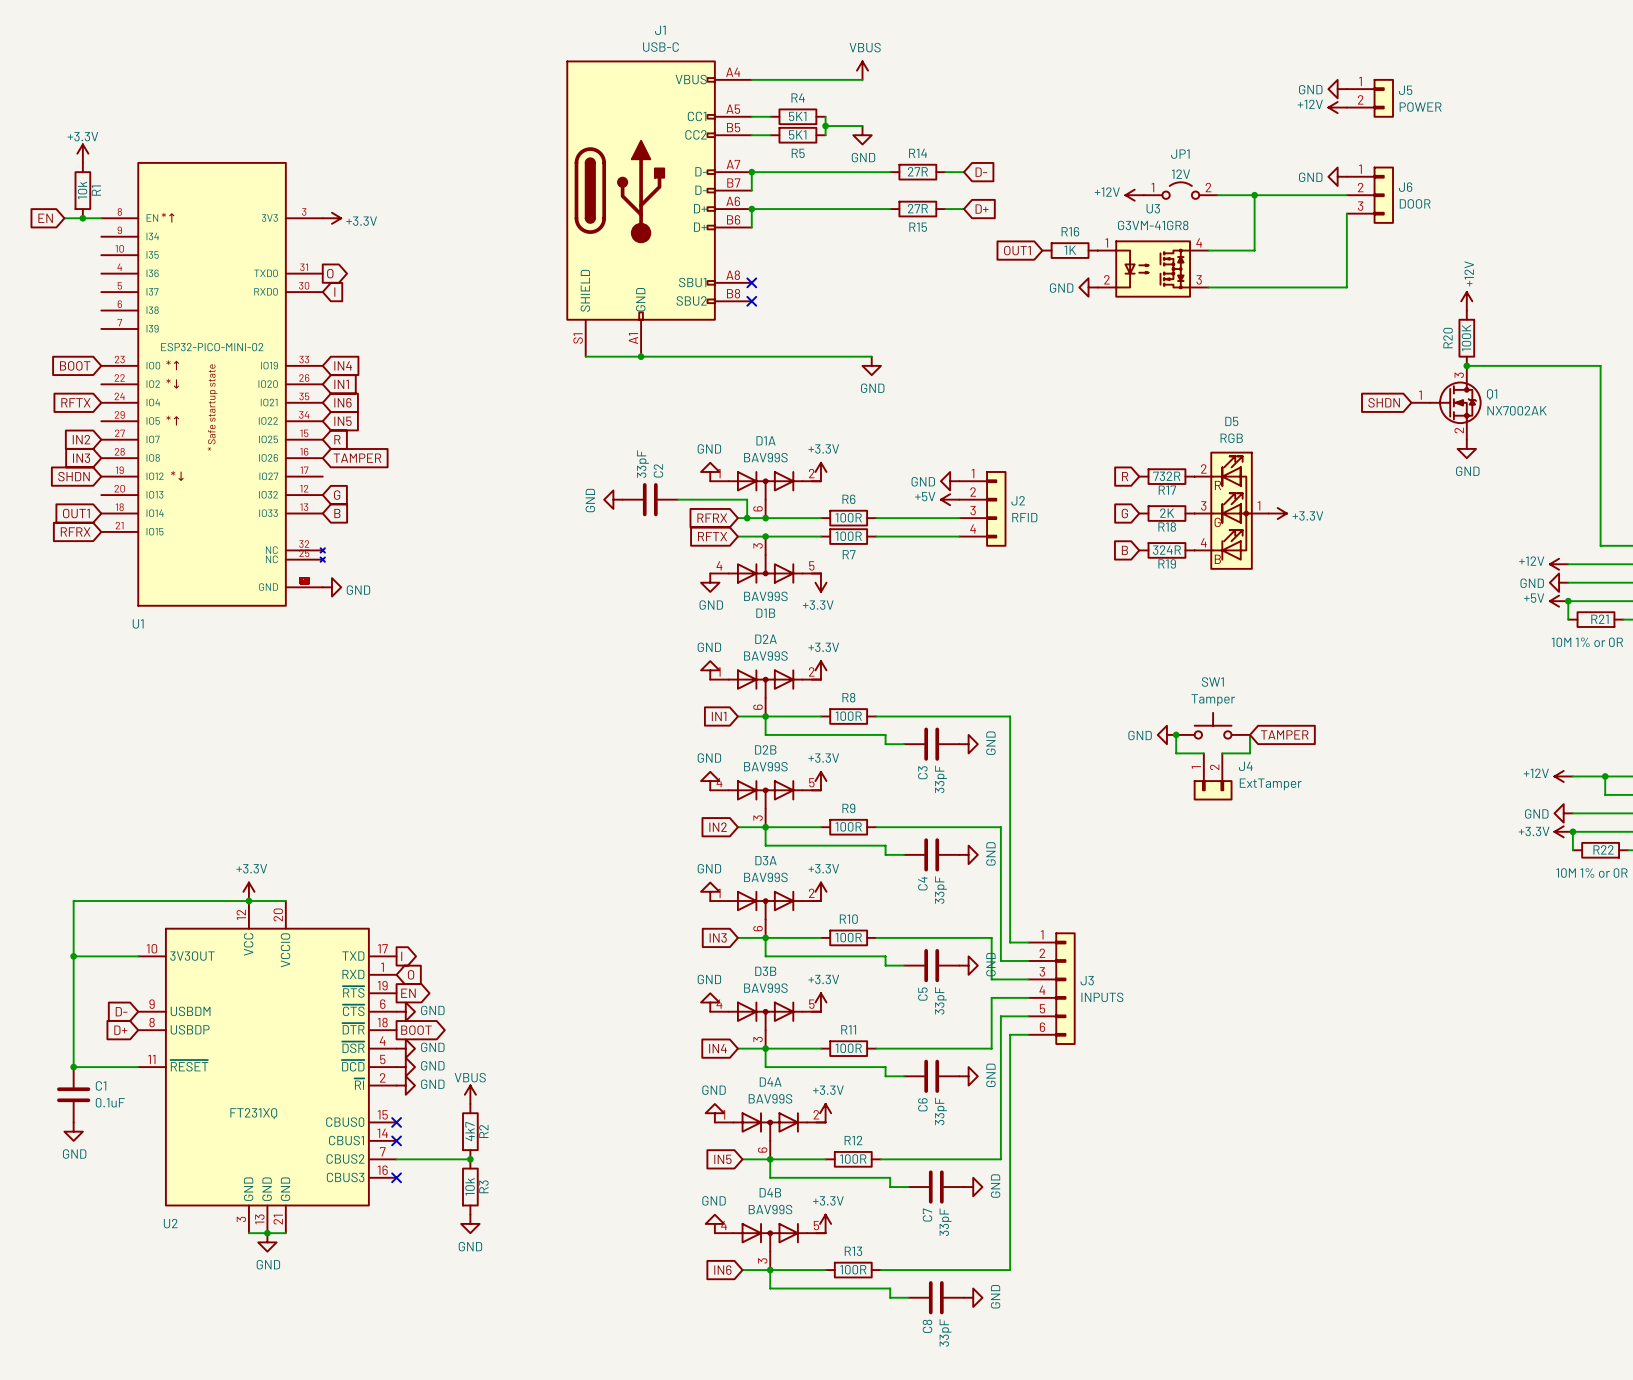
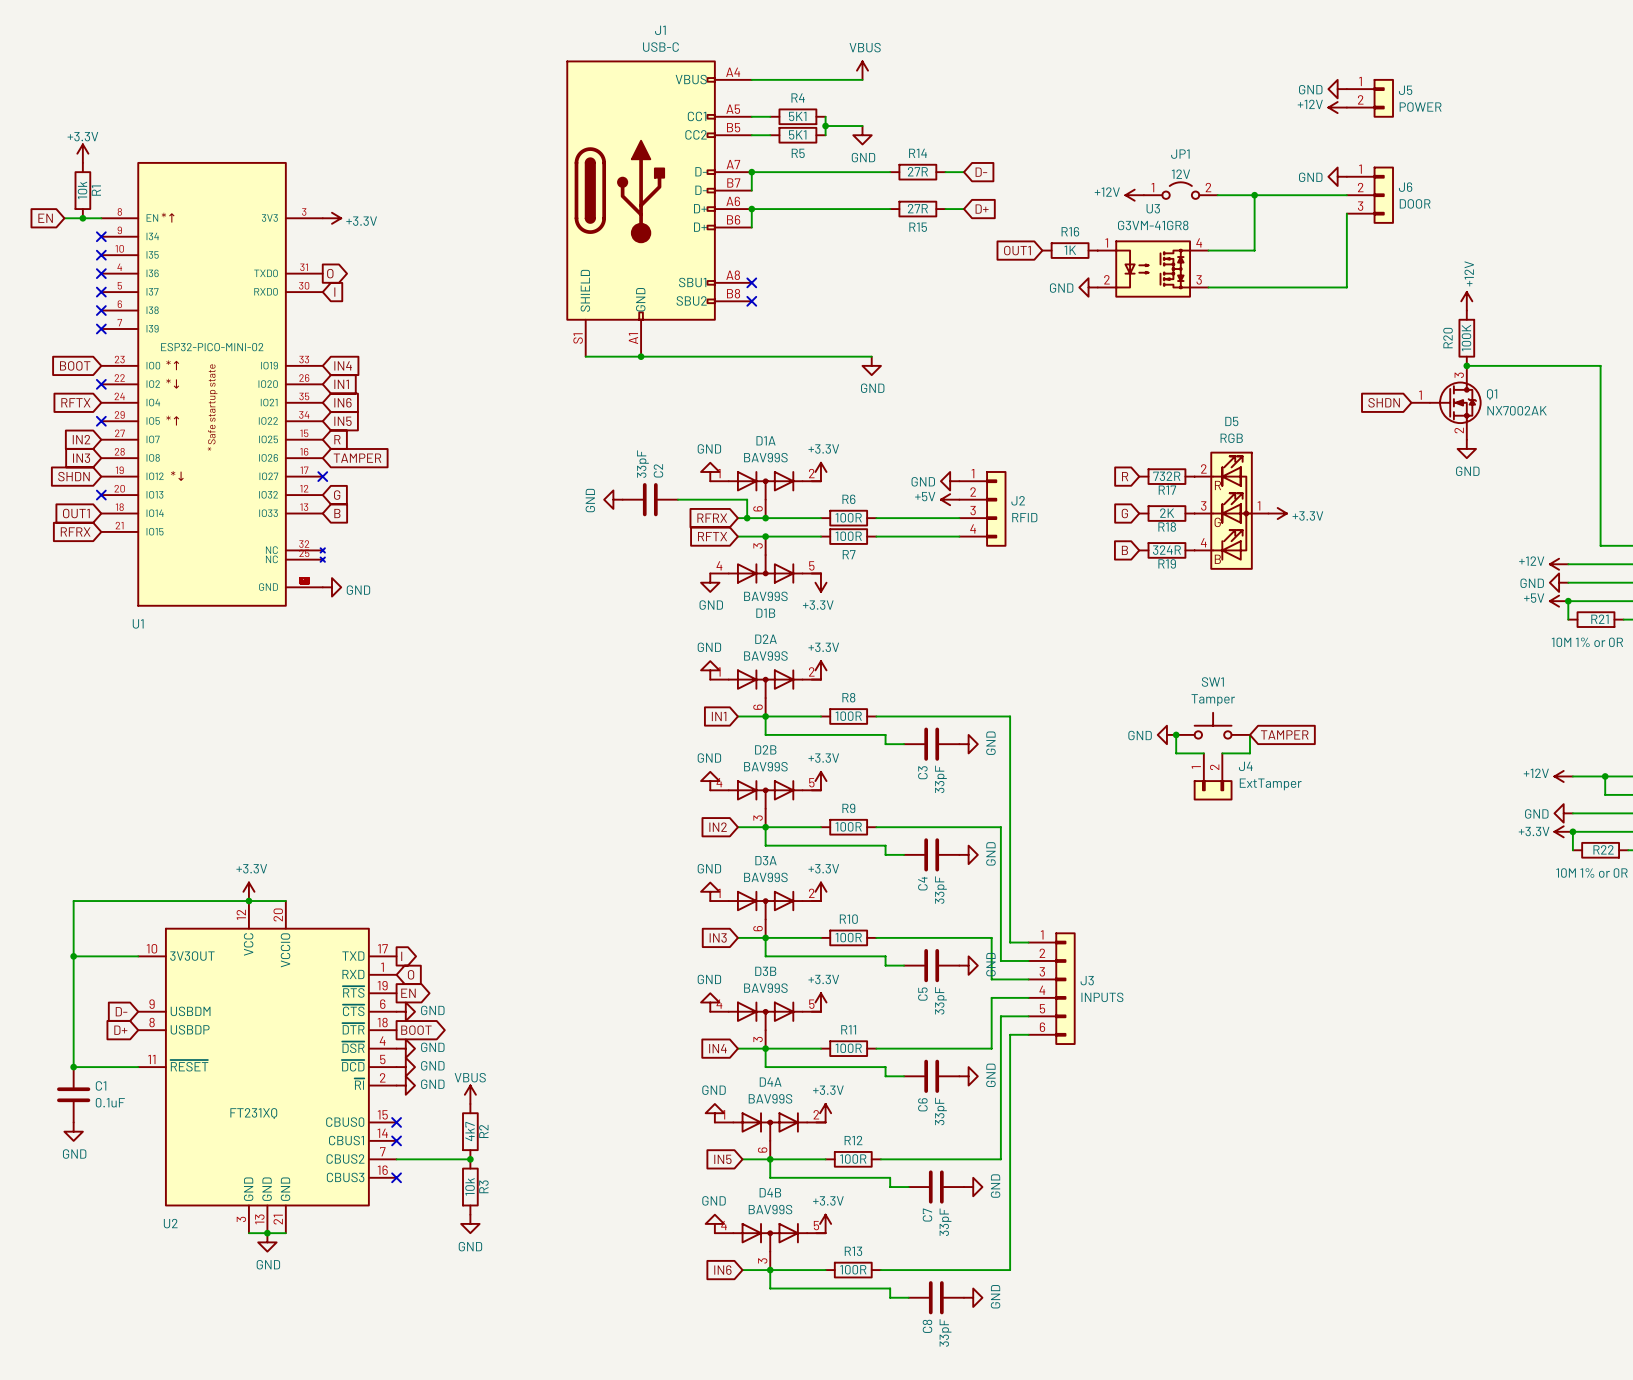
no-connect mark: none -> (101, 236)
no-connect mark: none -> (101, 255)
no-connect mark: none -> (101, 273)
no-connect mark: none -> (101, 292)
no-connect mark: none -> (101, 310)
no-connect mark: none -> (101, 328)
no-connect mark: none -> (101, 384)
no-connect mark: none -> (101, 421)
no-connect mark: none -> (322, 476)
no-connect mark: none -> (101, 495)

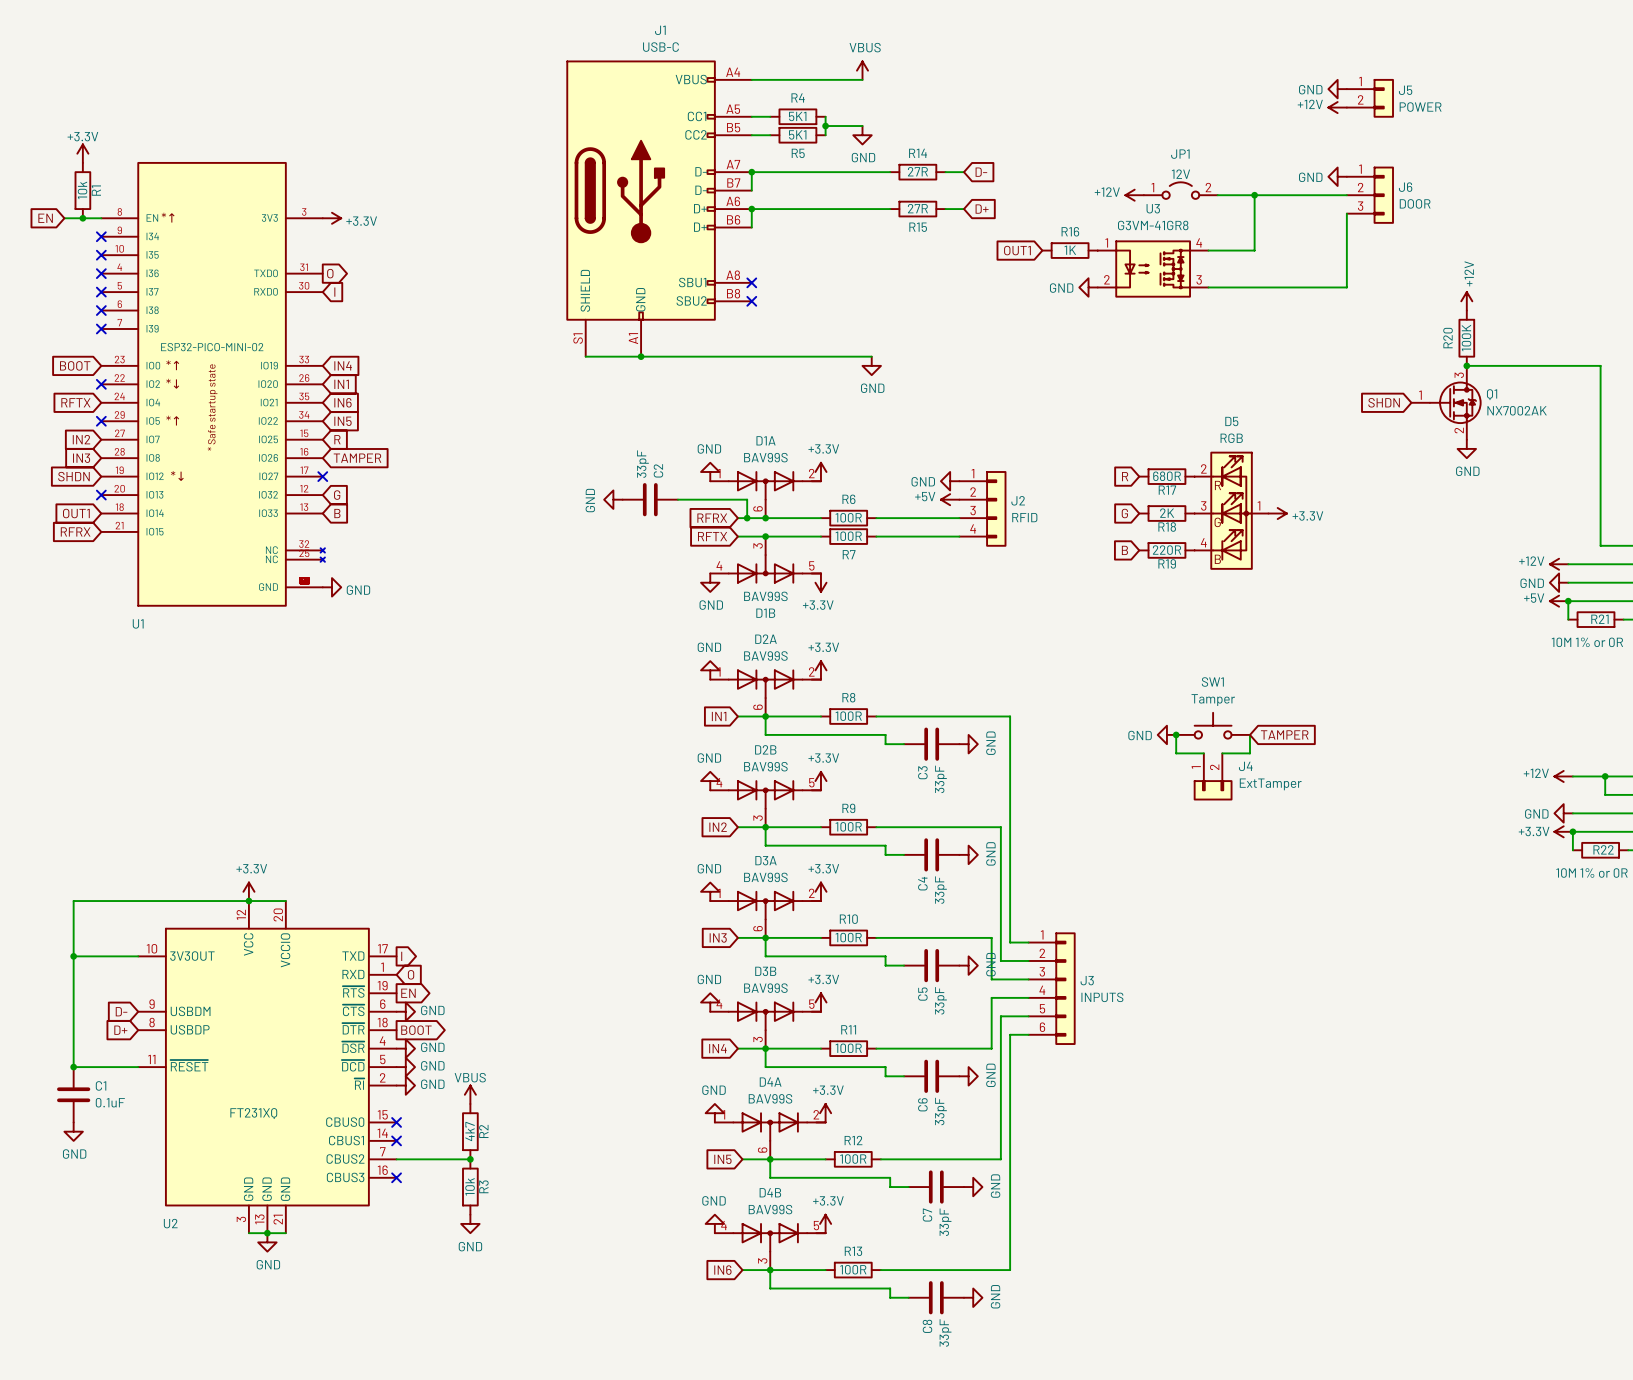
R17 value: 732R (1166, 476) -> 680R (1167, 476)
R19 value: 324R (1166, 550) -> 220R (1167, 550)

